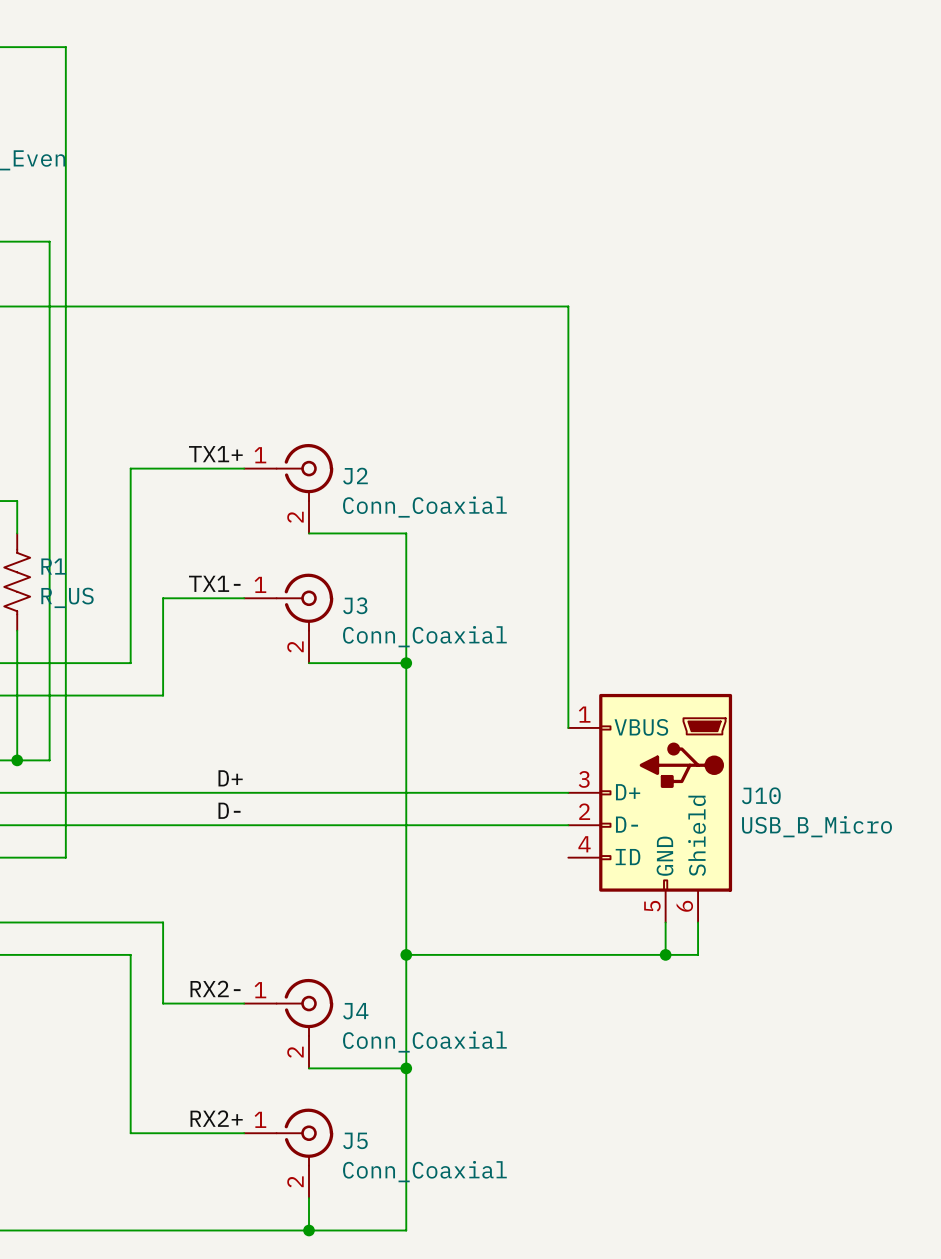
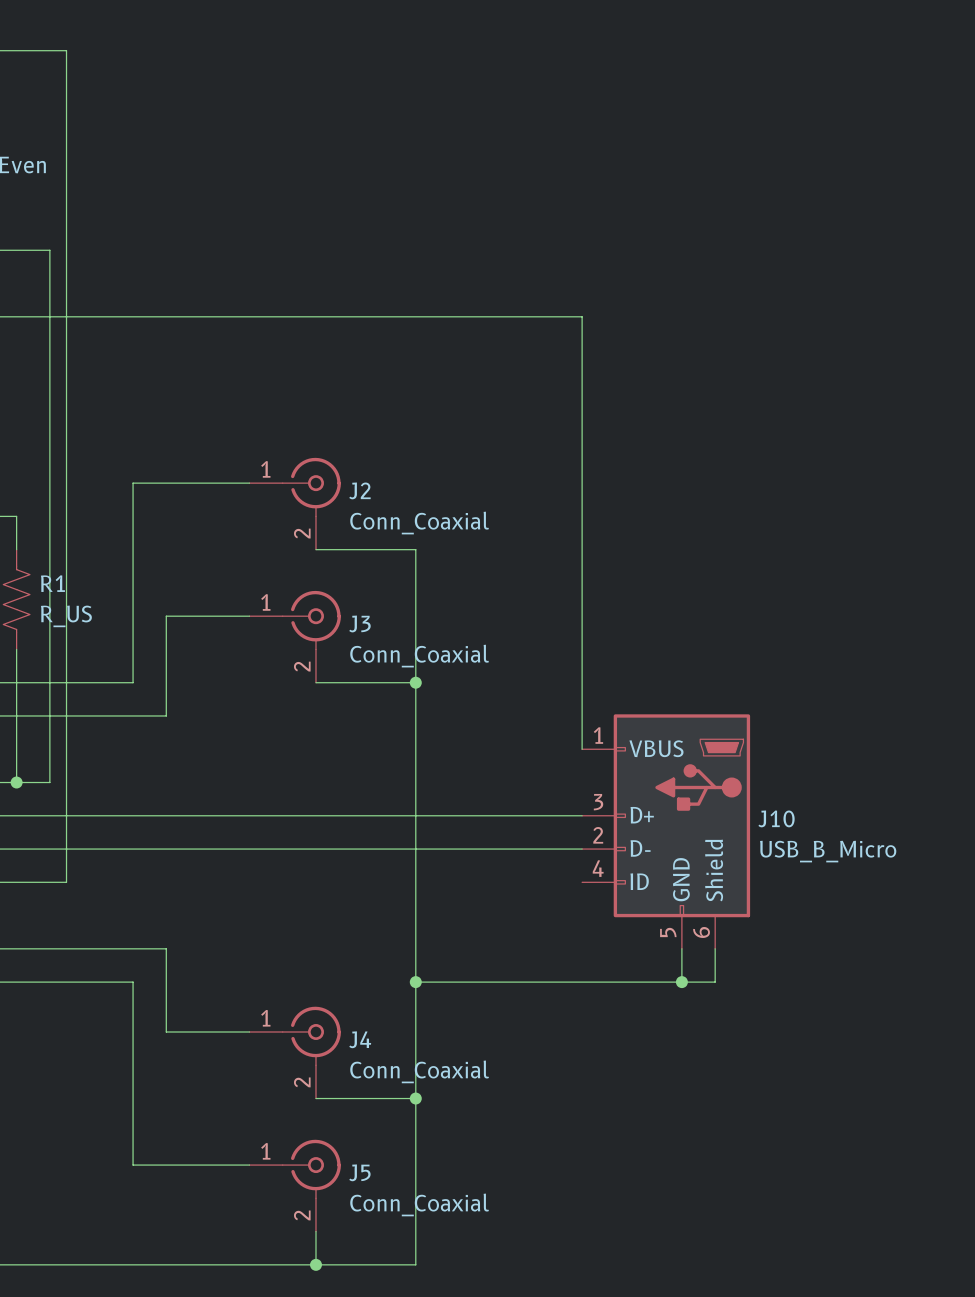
label: TX1+ (215, 454) -> none
label: TX1- (214, 583) -> none
label: D+ (230, 778) -> none
label: D- (229, 810) -> none
label: RX2- (215, 988) -> none
label: RX2+ (216, 1118) -> none

